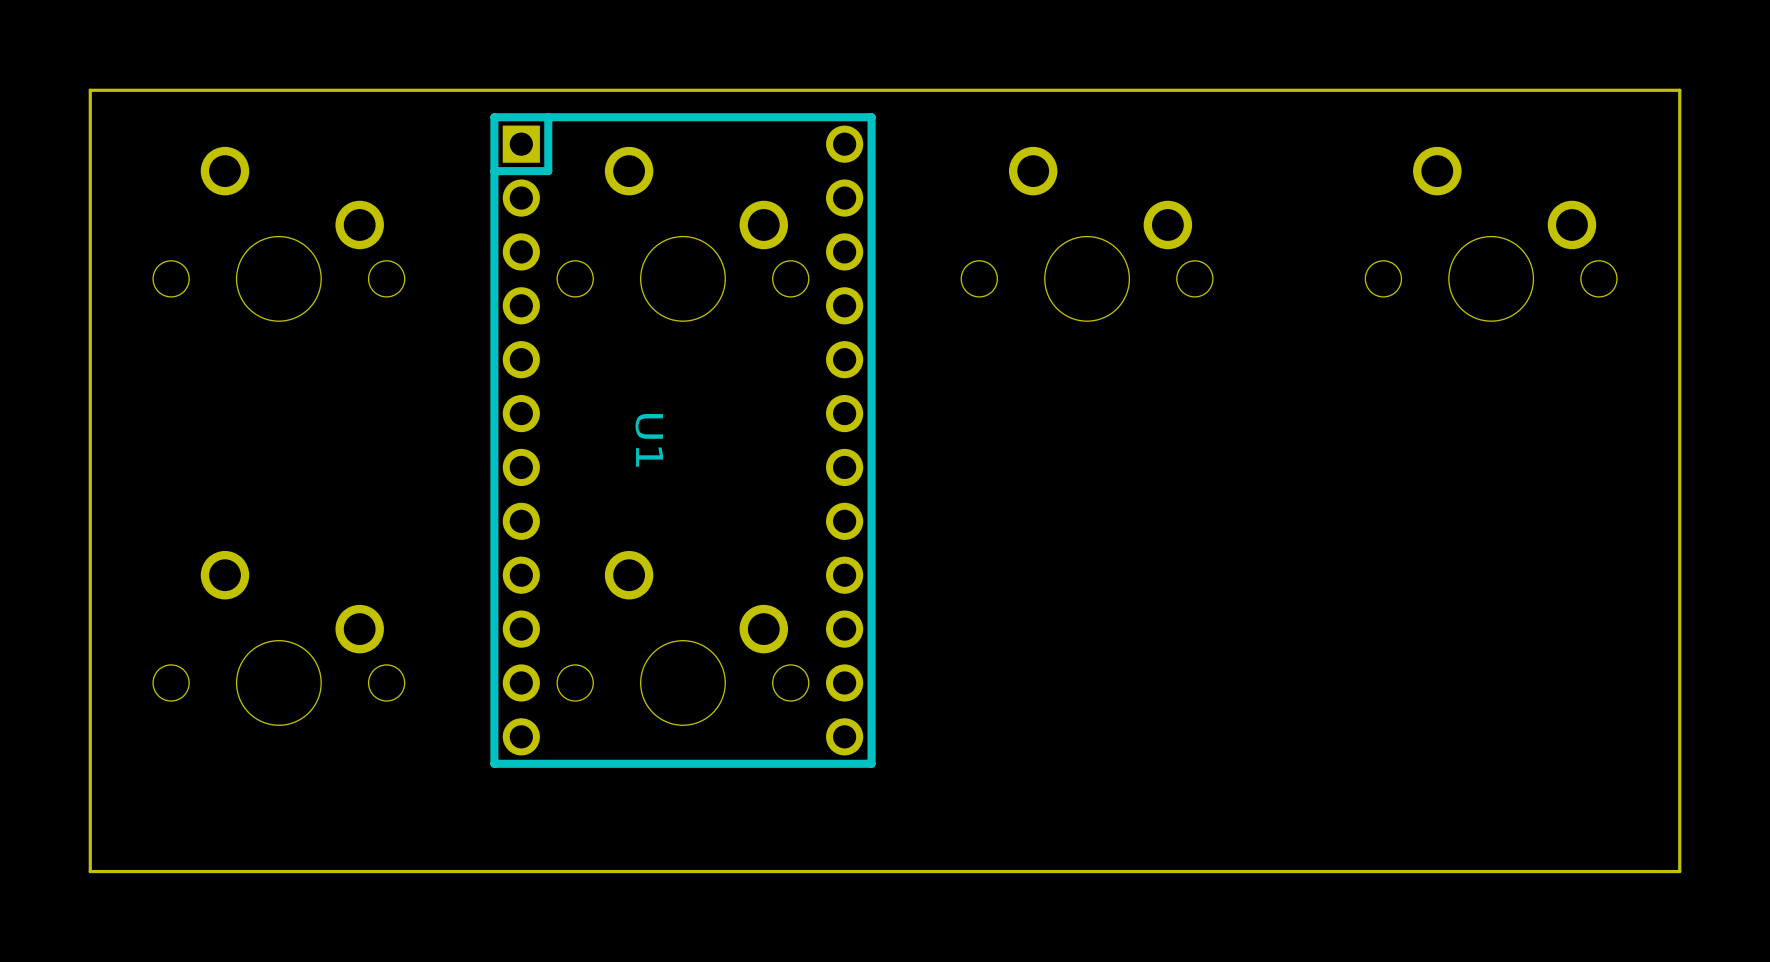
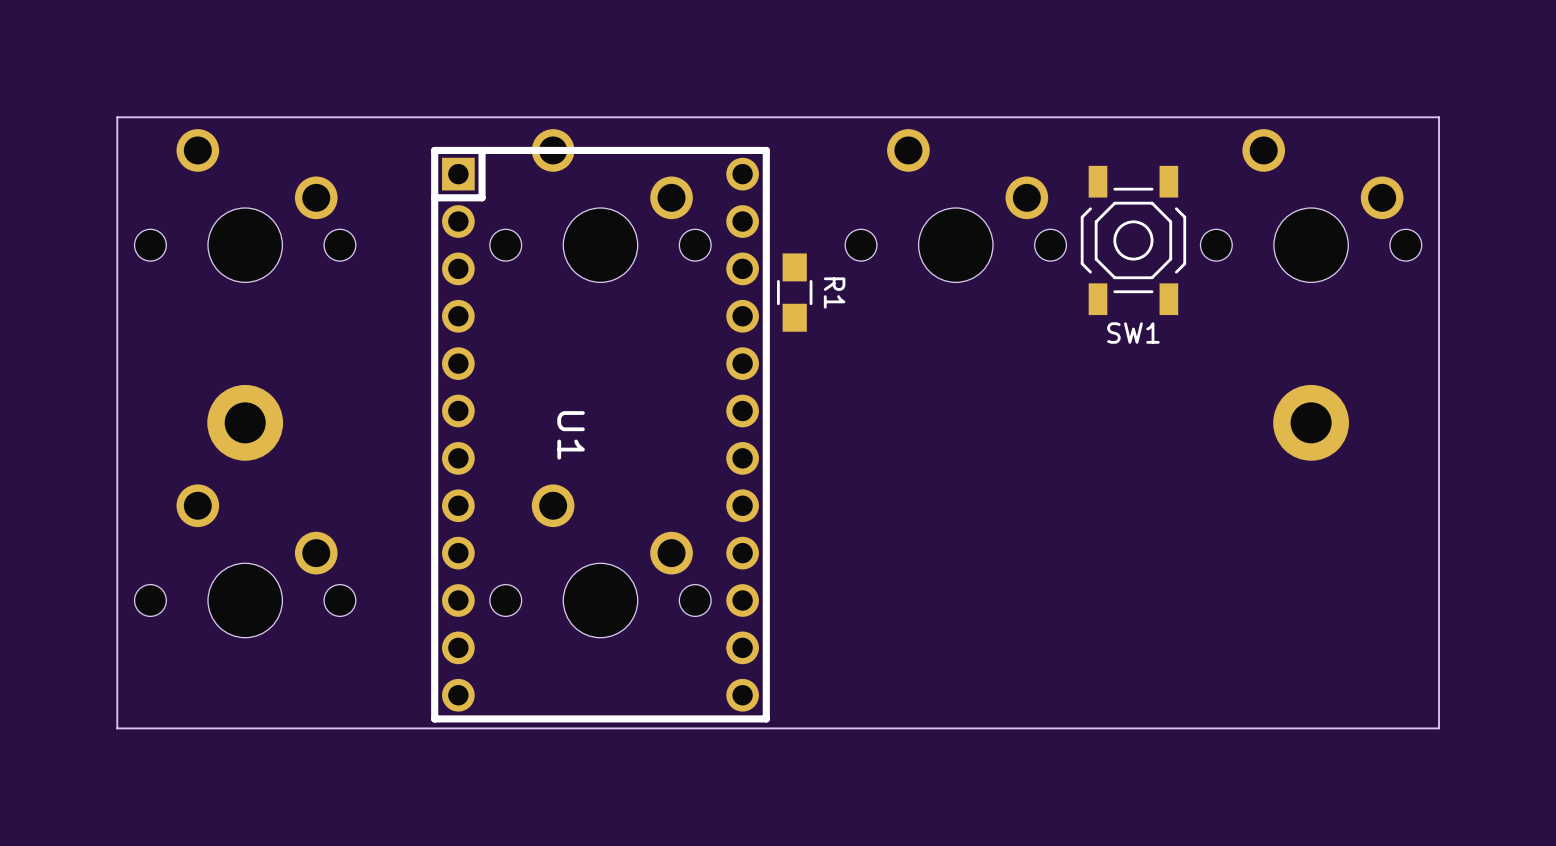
board edge: (1679, 90) (90, 90) (90, 871) (1679, 871) (1679, 90) -> (1439, 117) (1439, 728) (117, 728) (117, 117) (1439, 117)
SW1: none -> (1133, 240)
R1: none -> (794, 292)
U1 position: (682, 440) -> (600, 434)
part: none -> (245, 422)
part: none -> (1311, 422)

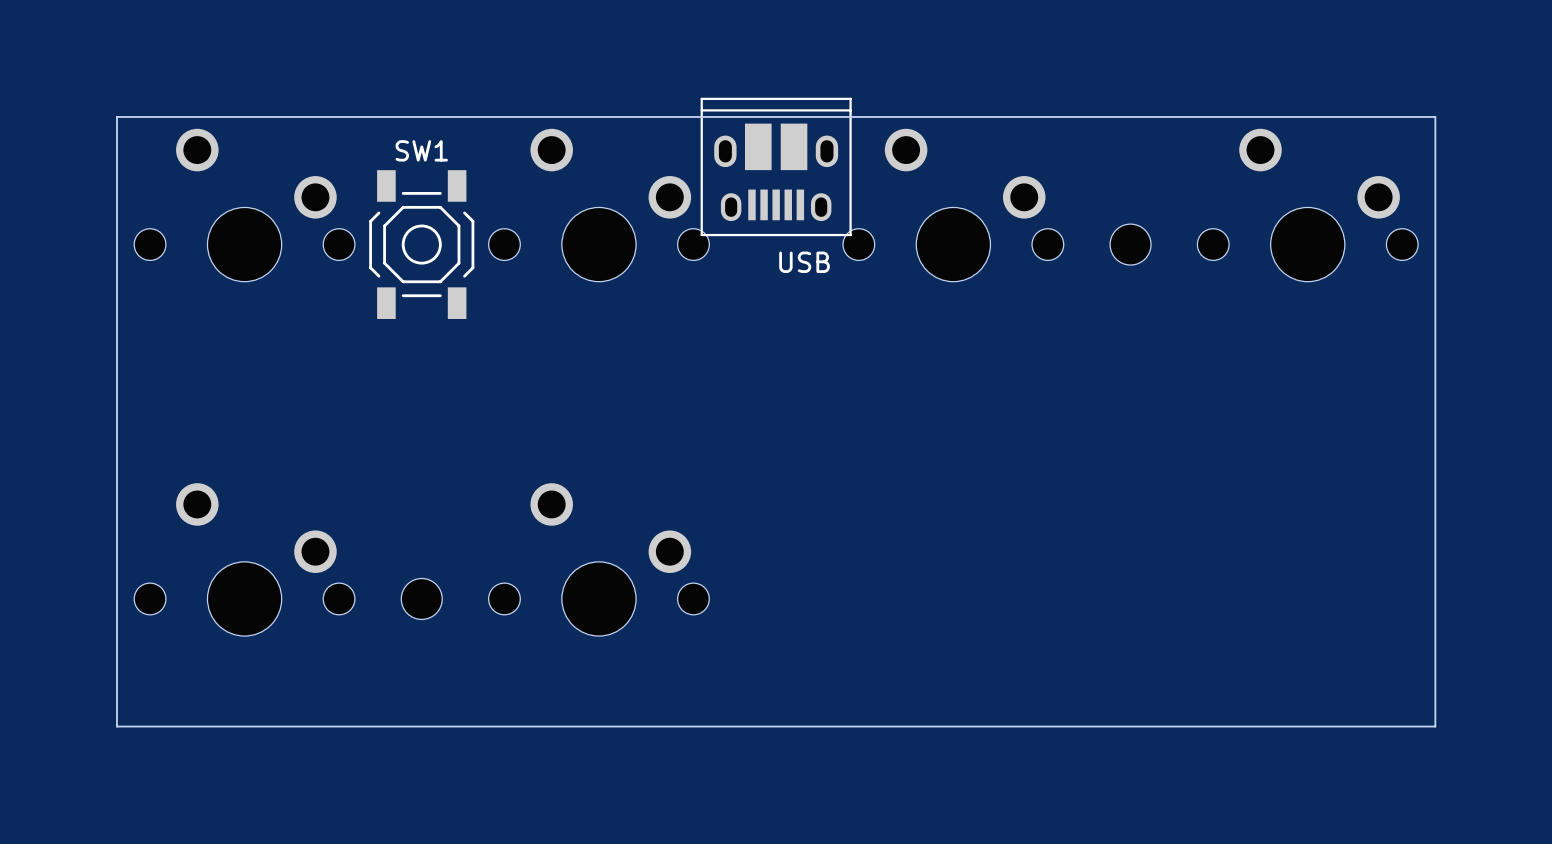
USB: none -> (776, 166)
SW1 position: (1133, 240) -> (421, 244)
part: none -> (1130, 244)
R1: (794, 292) -> none
SW1 name position: SW1 (1133, 333) -> SW1 (421, 150)
part: (245, 422) -> none
part: (1311, 422) -> none
U1: (600, 434) -> none
part: none -> (421, 598)

